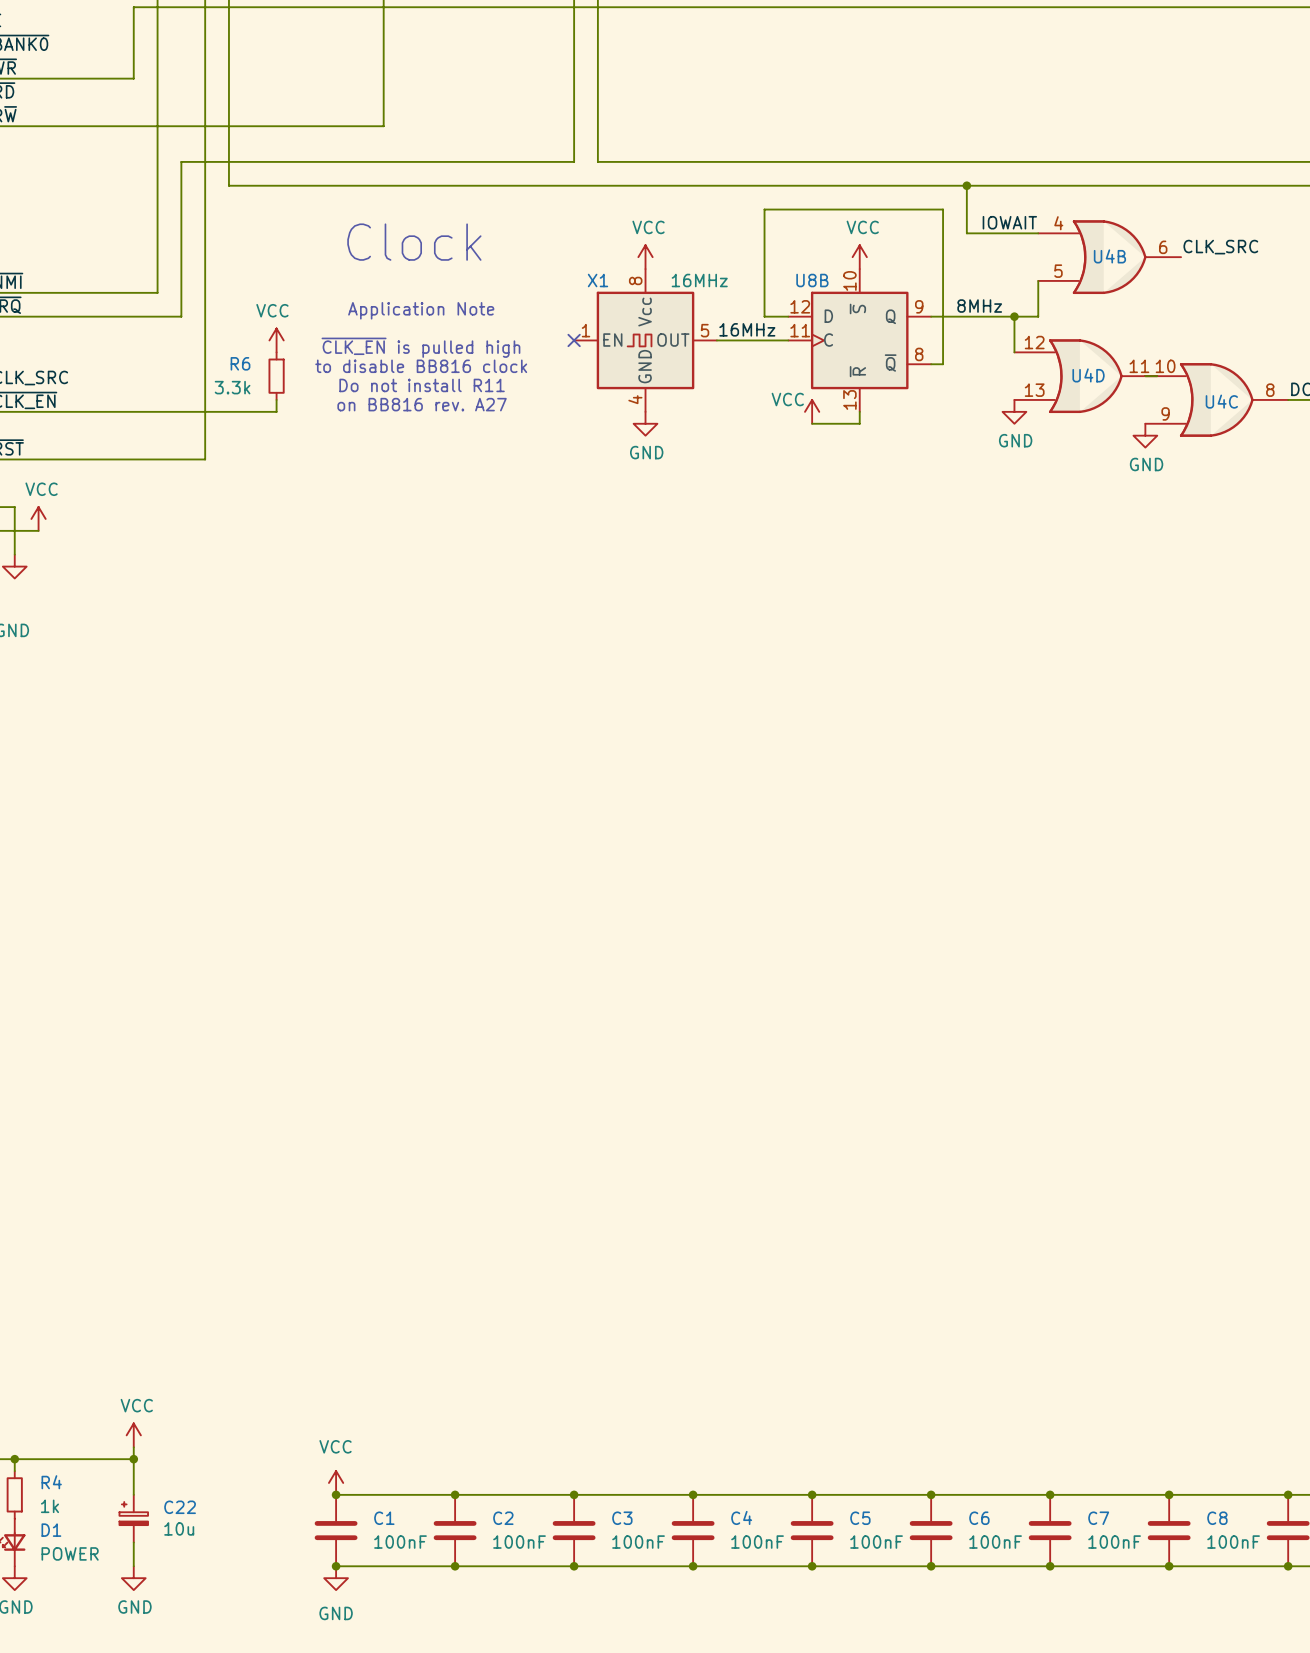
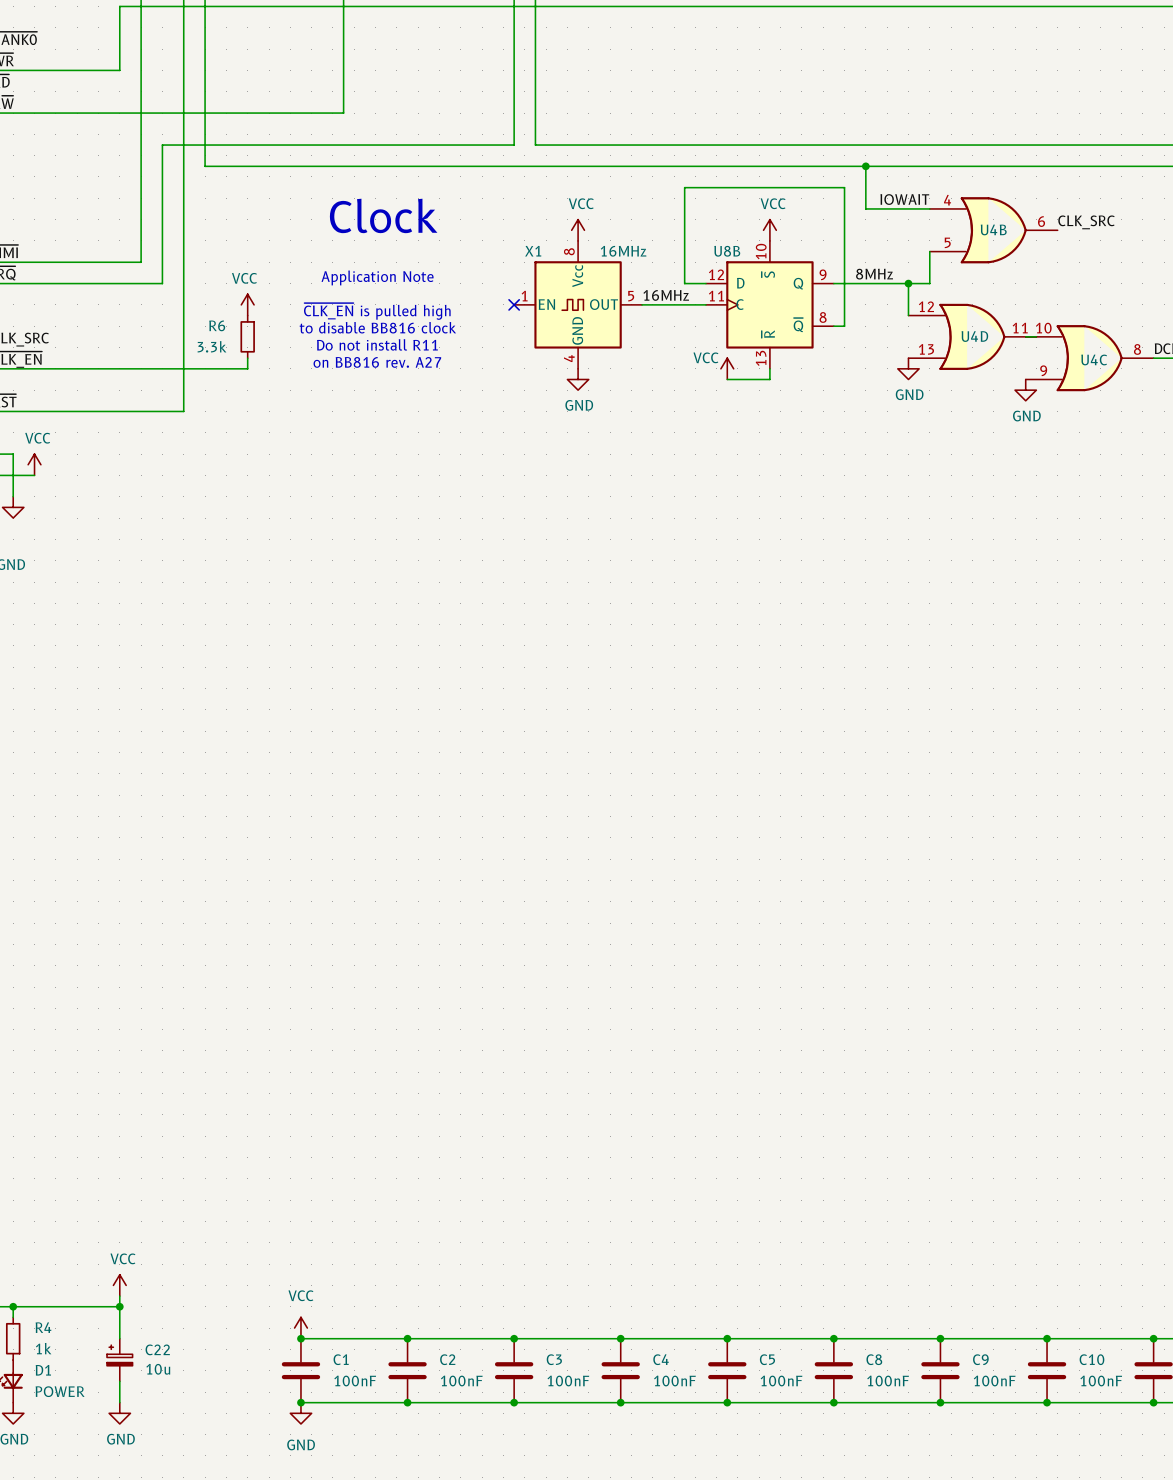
C6 name: C6 (979, 1518) -> C8 (874, 1359)
C7 name: C7 (1098, 1518) -> C9 (980, 1359)
C8 name: C8 (1217, 1518) -> C10 (1091, 1359)

